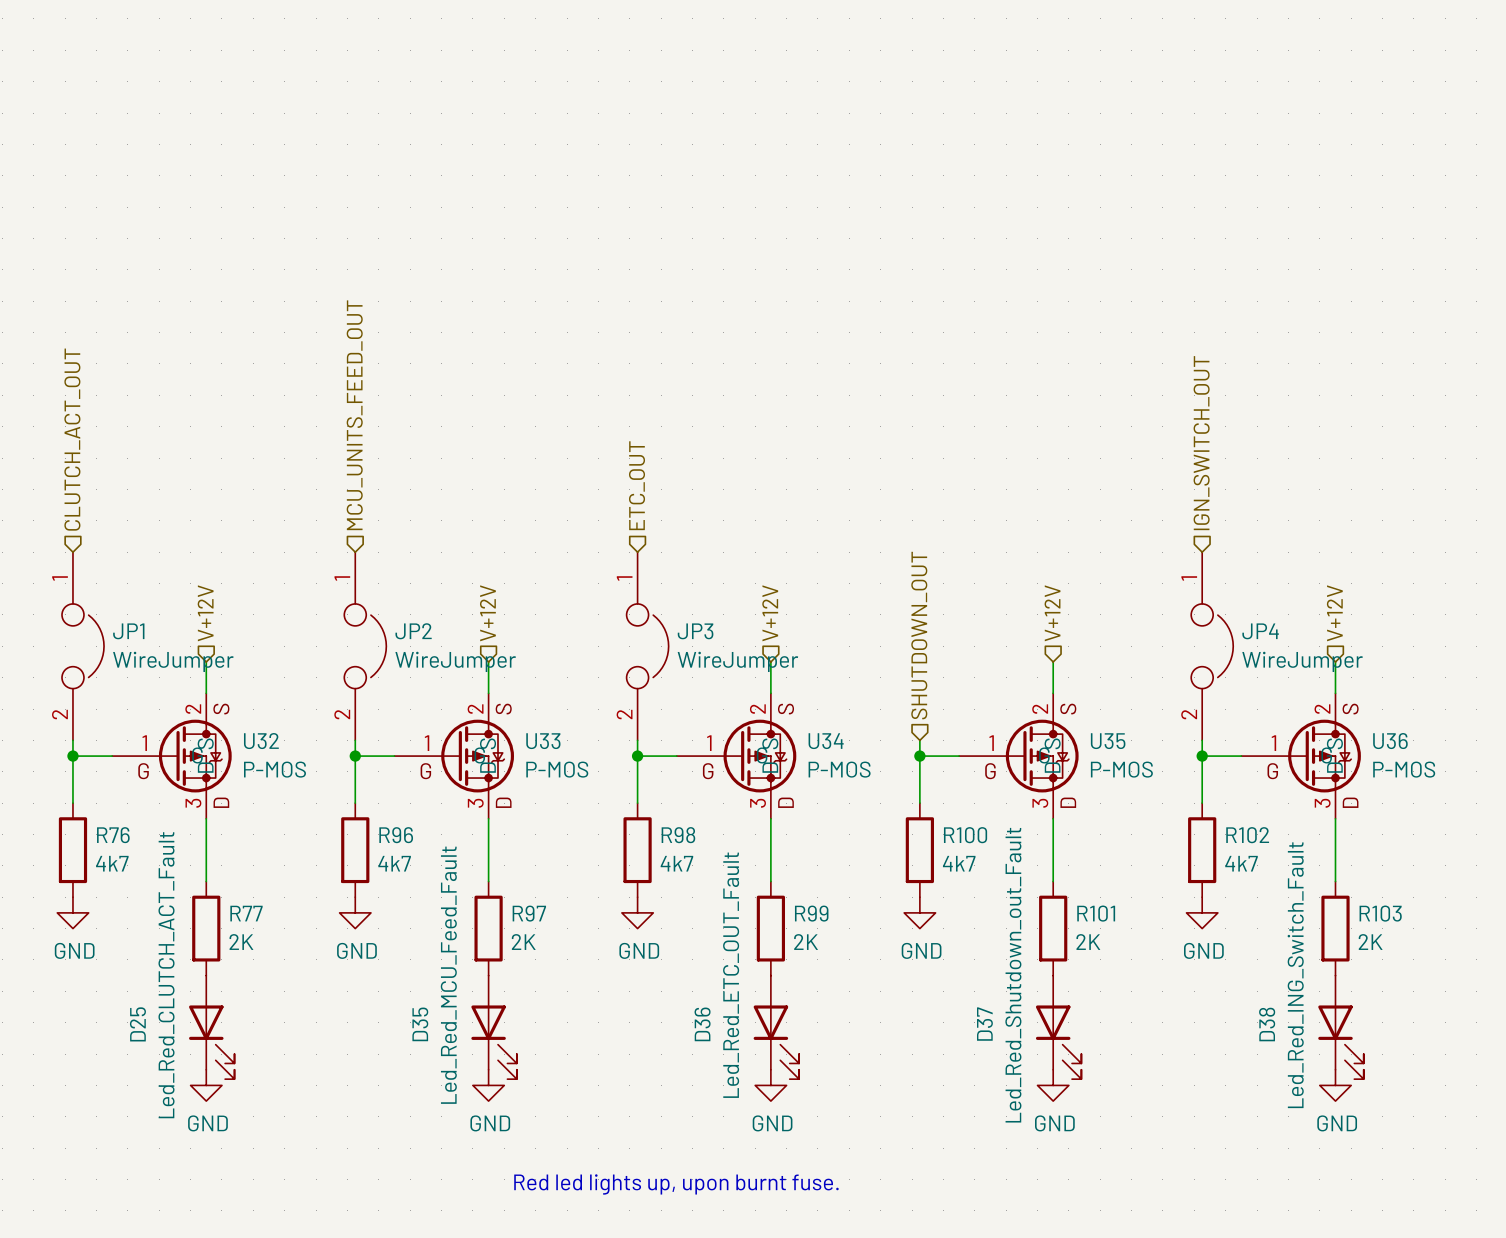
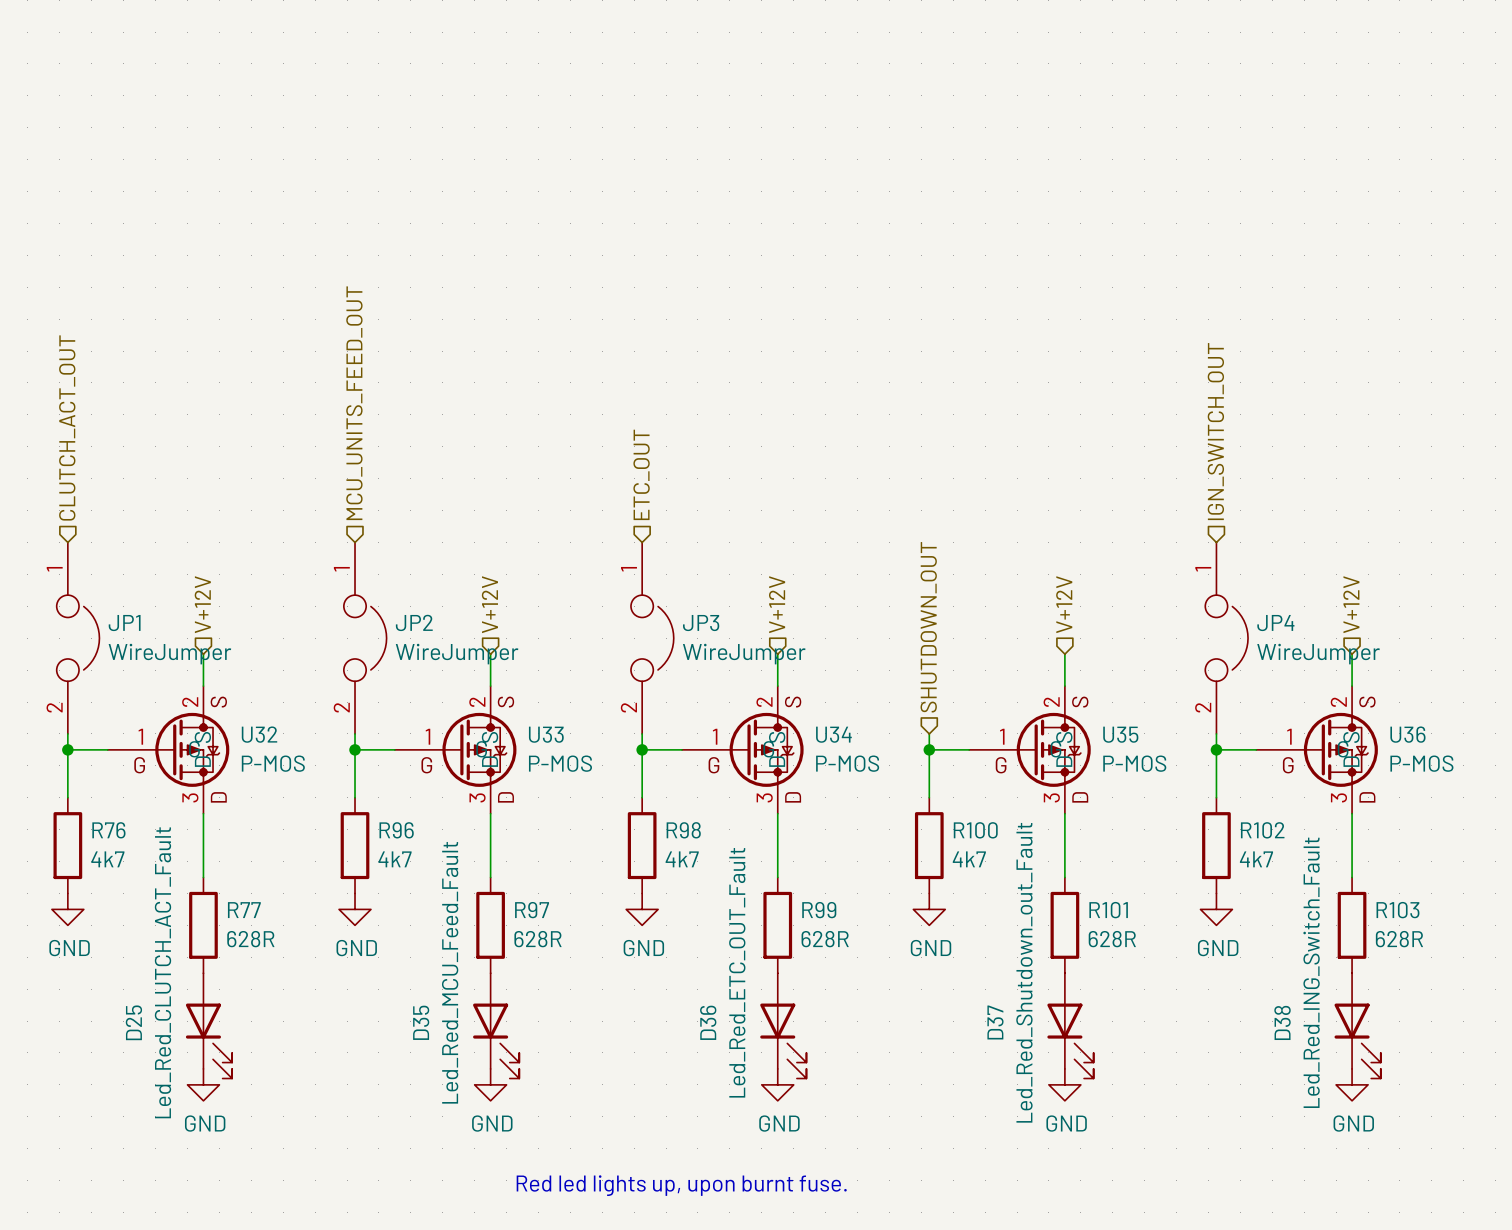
R77 value: 2K (241, 942) -> 628R (250, 939)
R97 value: 2K (523, 942) -> 628R (538, 939)
R99 value: 2K (806, 942) -> 628R (825, 939)
R101 value: 2K (1088, 942) -> 628R (1112, 939)
R103 value: 2K (1370, 942) -> 628R (1399, 939)

